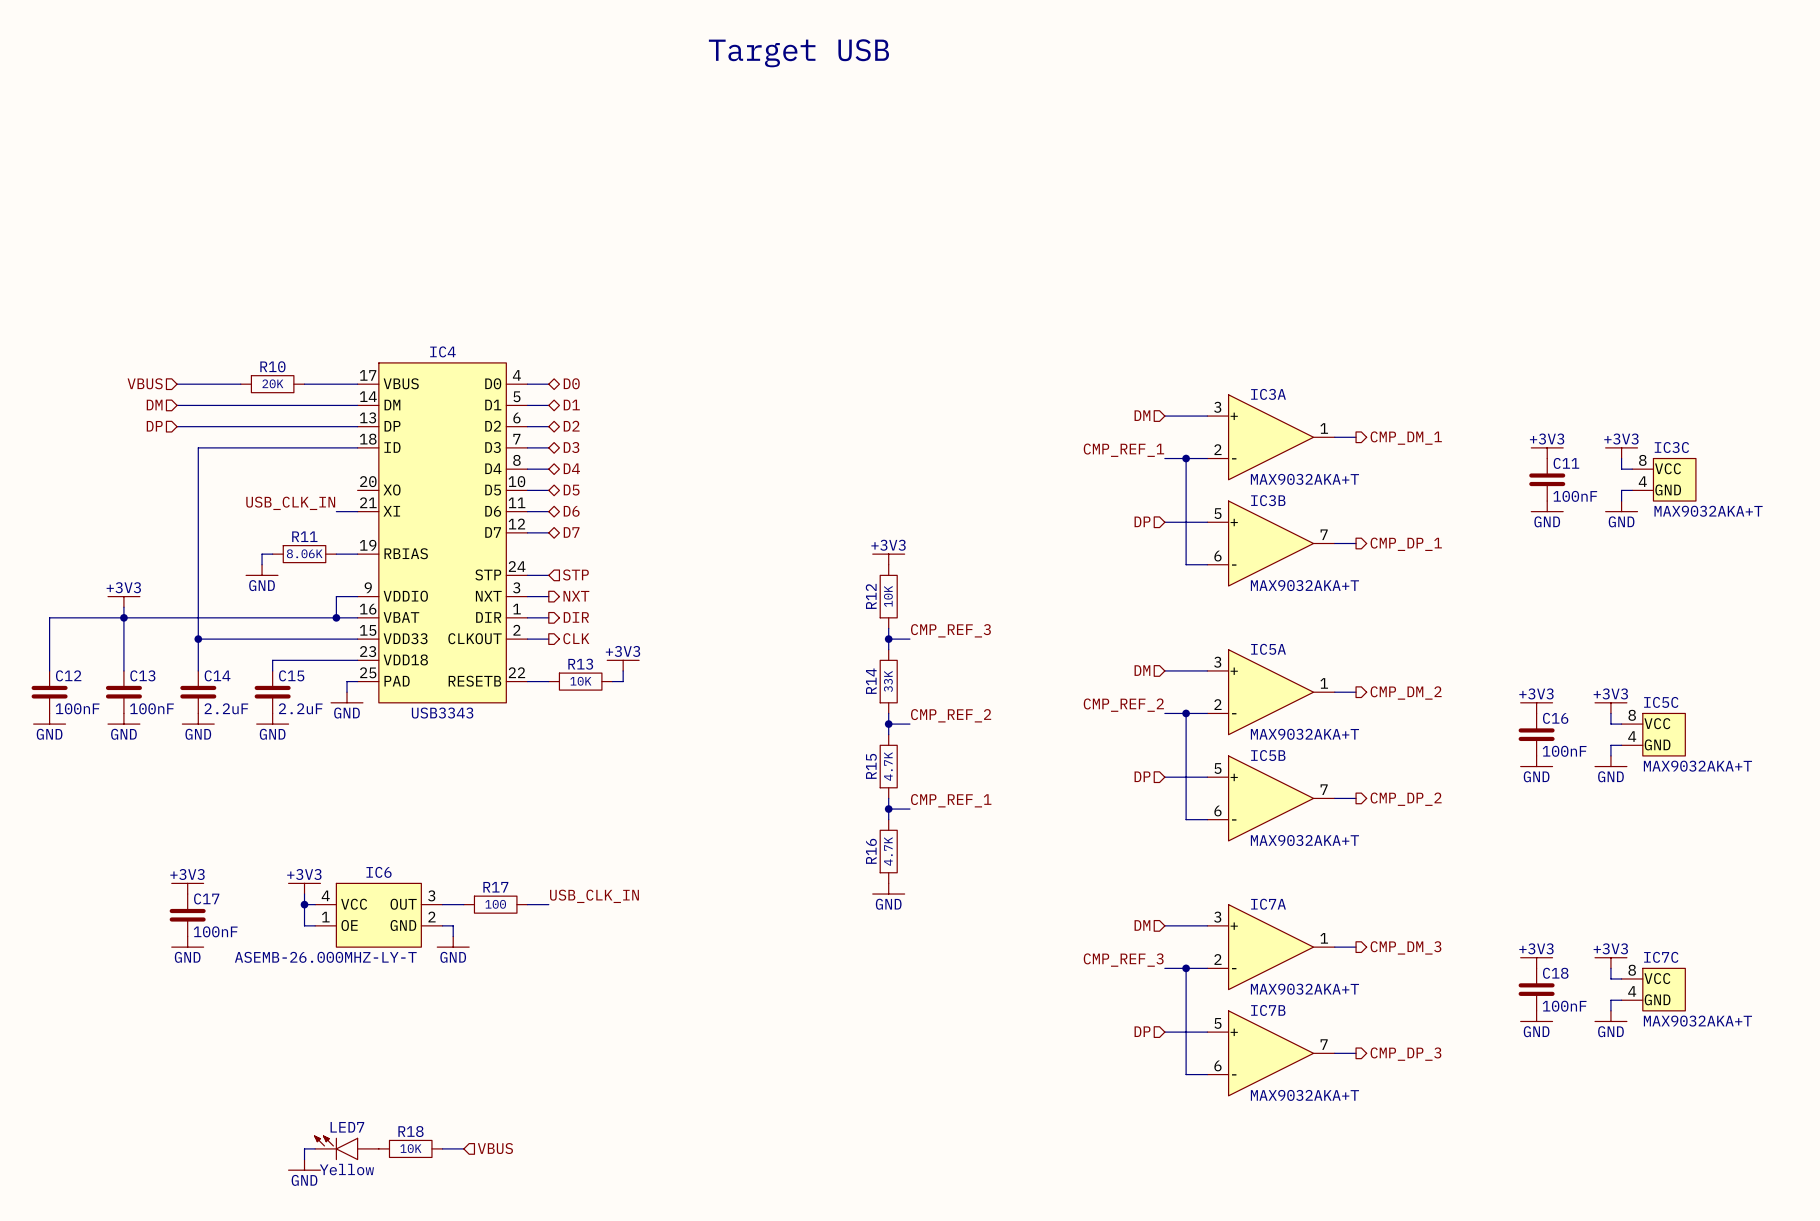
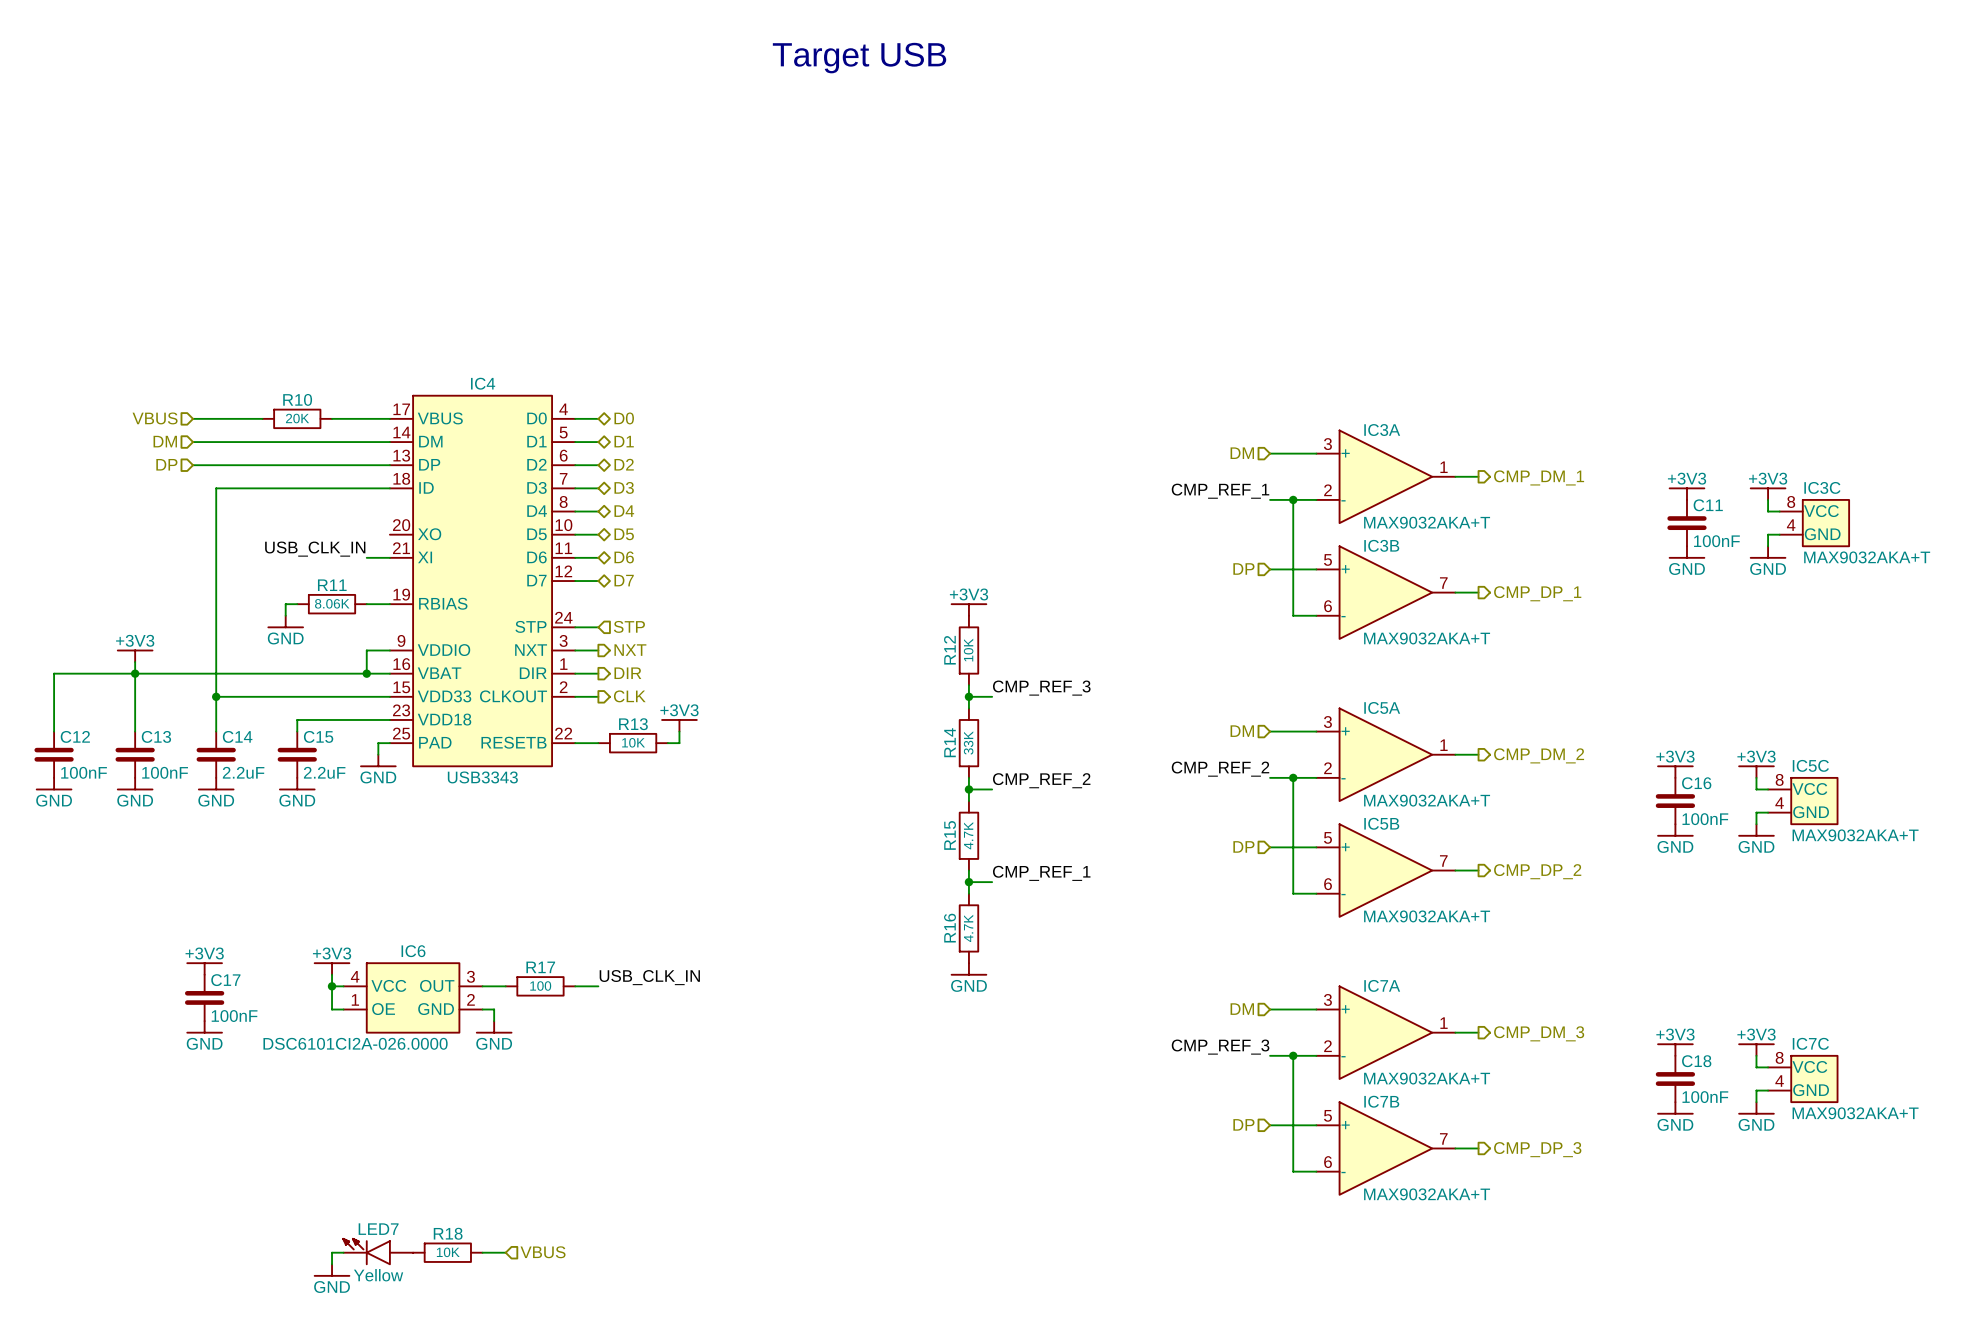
IC6 value: ASEMB-26.000MHZ-LY-T (325, 957) -> DSC6101CI2A-026.0000 (355, 1043)

